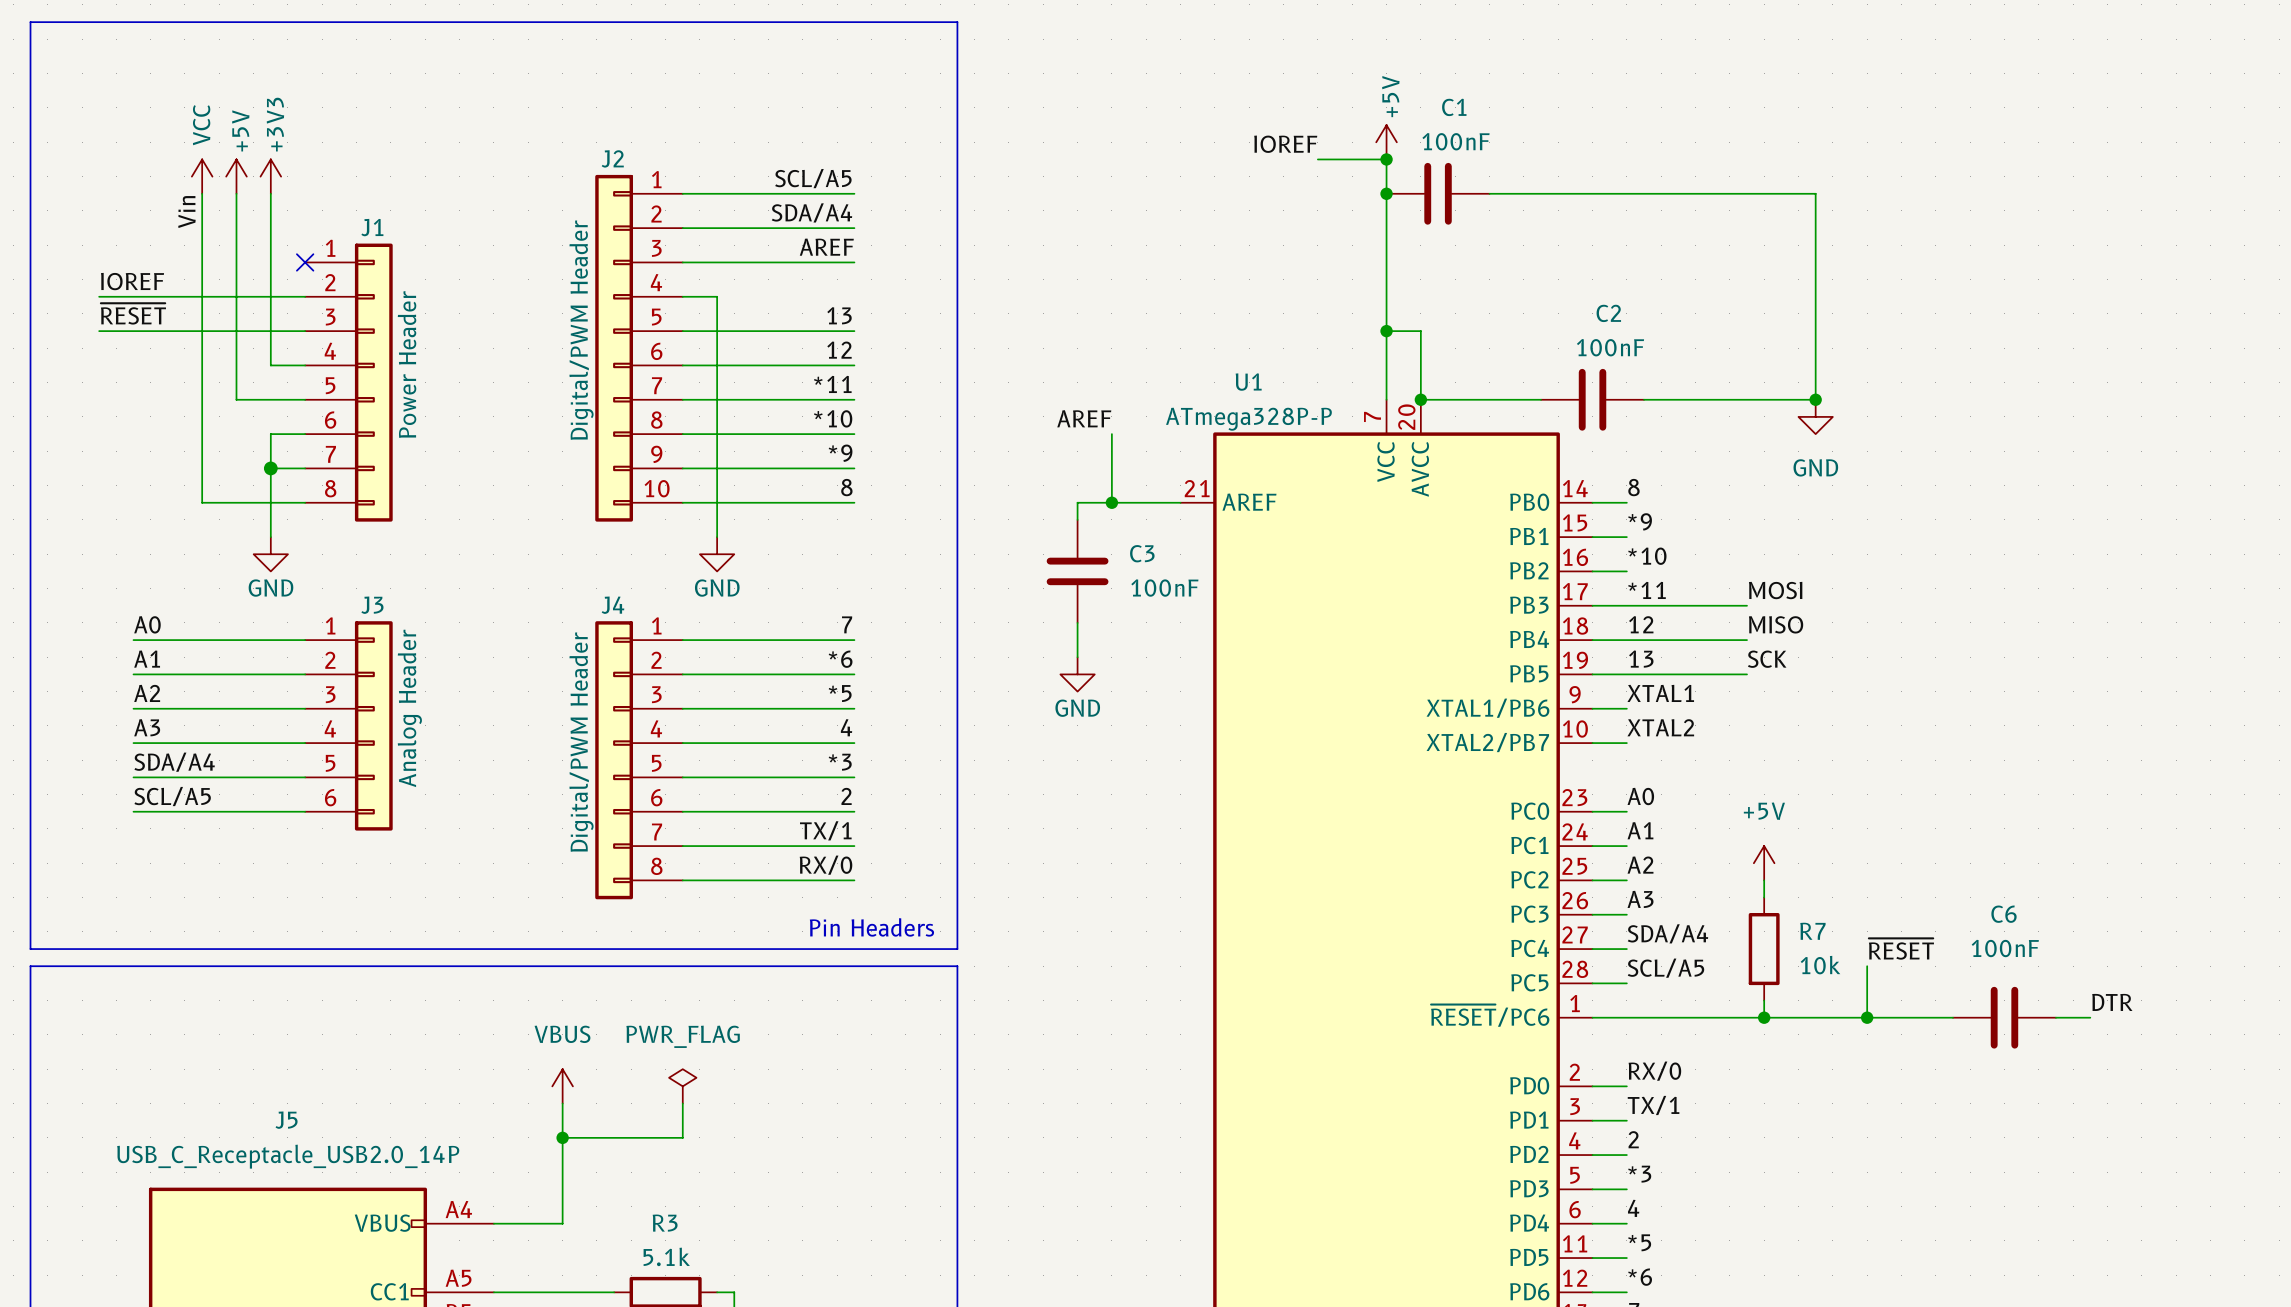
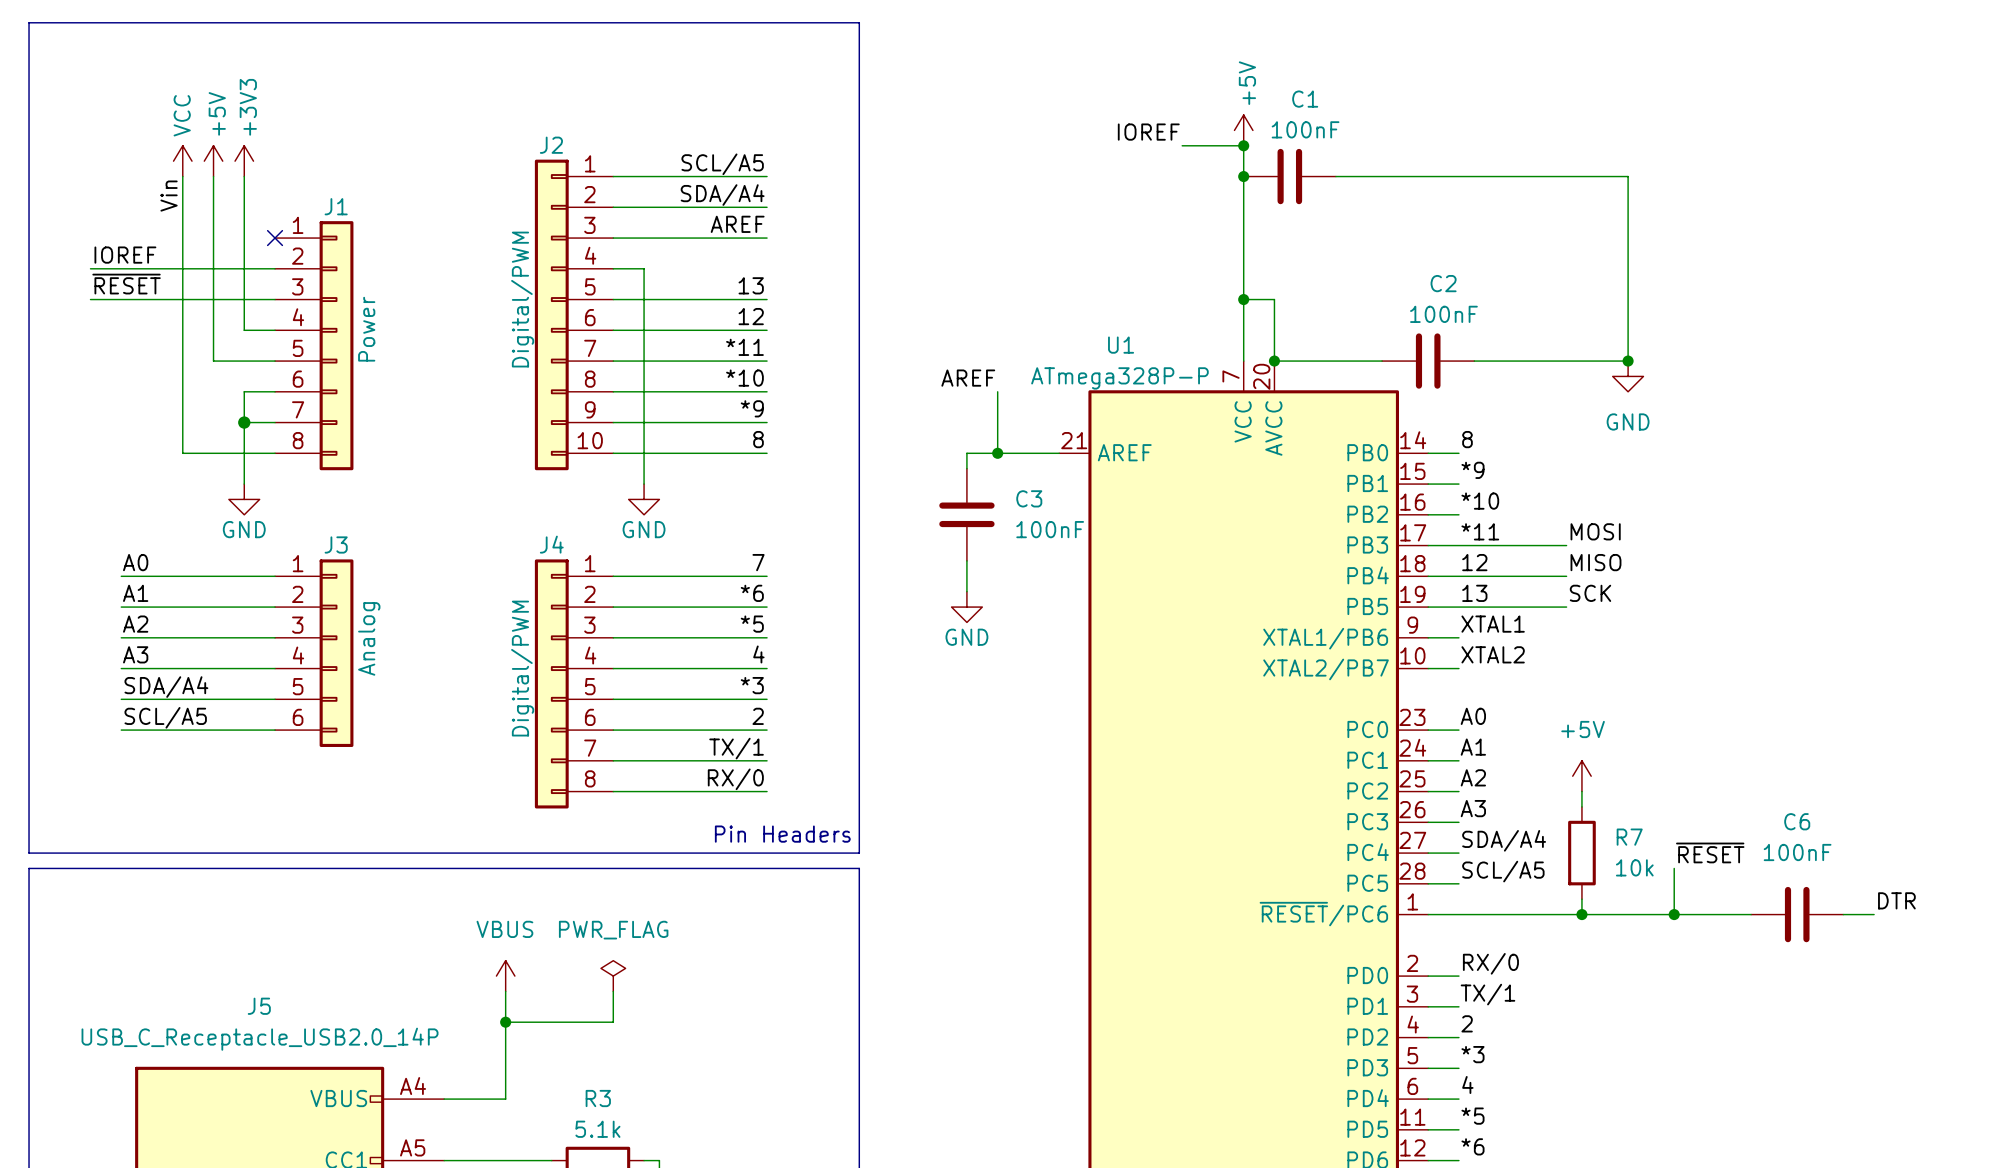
J2 value: Digital/PWM Header (581, 330) -> Digital/PWM (522, 299)
J1 value: Power Header (407, 364) -> Power (366, 329)
J3 value: Analog Header (409, 708) -> Analog (369, 638)
J4 value: Digital/PWM Header (581, 742) -> Digital/PWM (522, 668)

